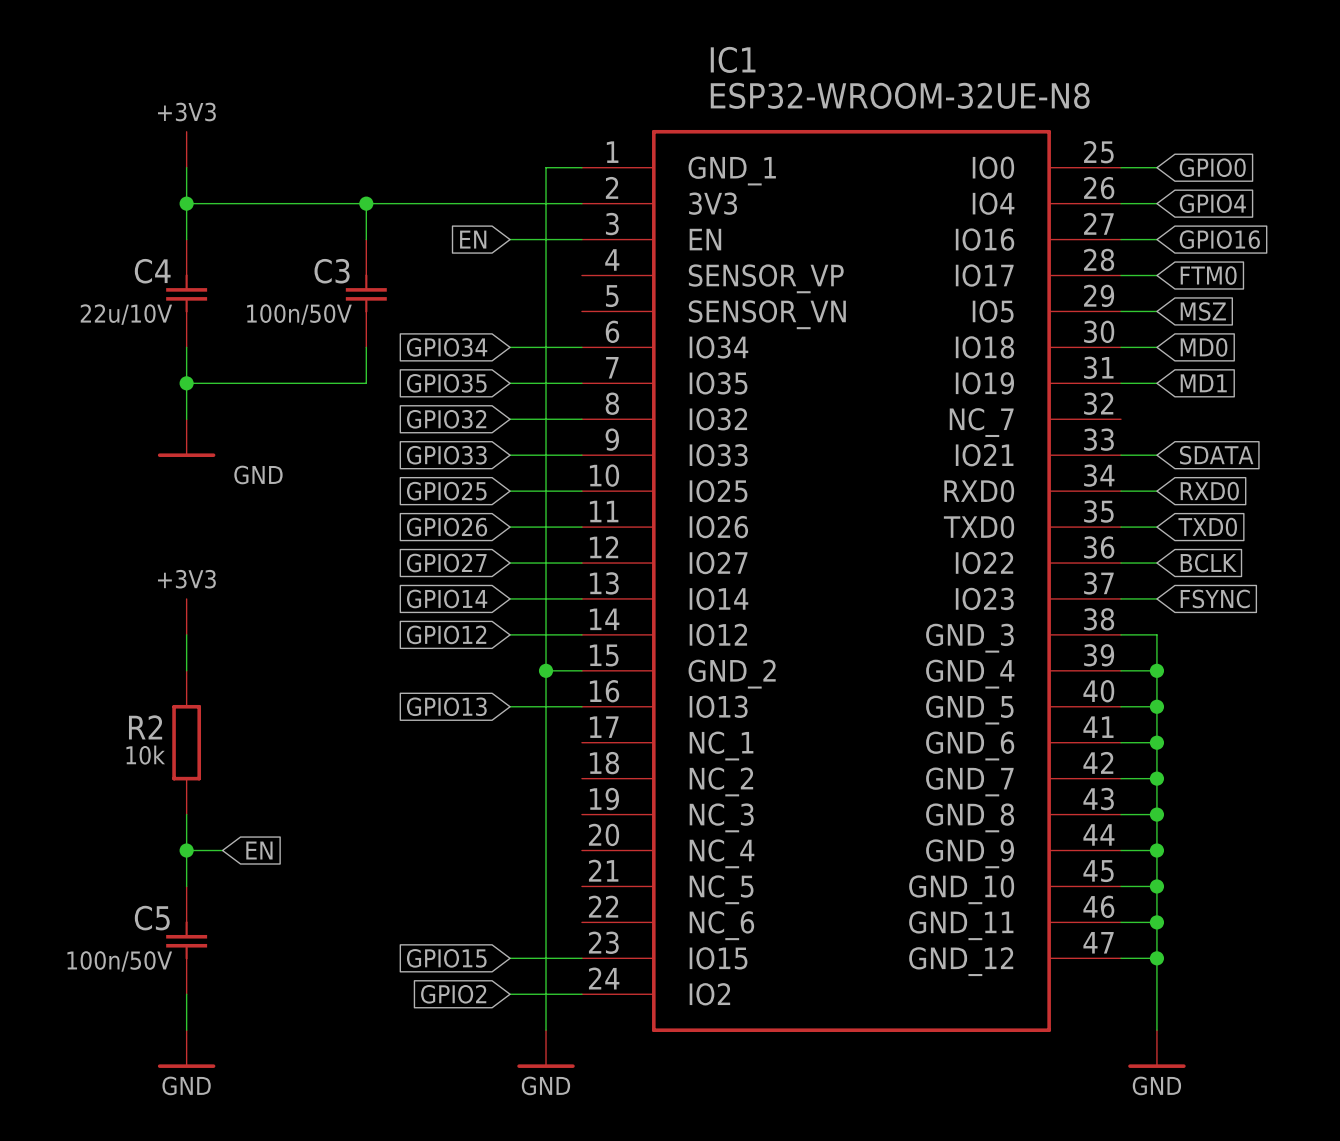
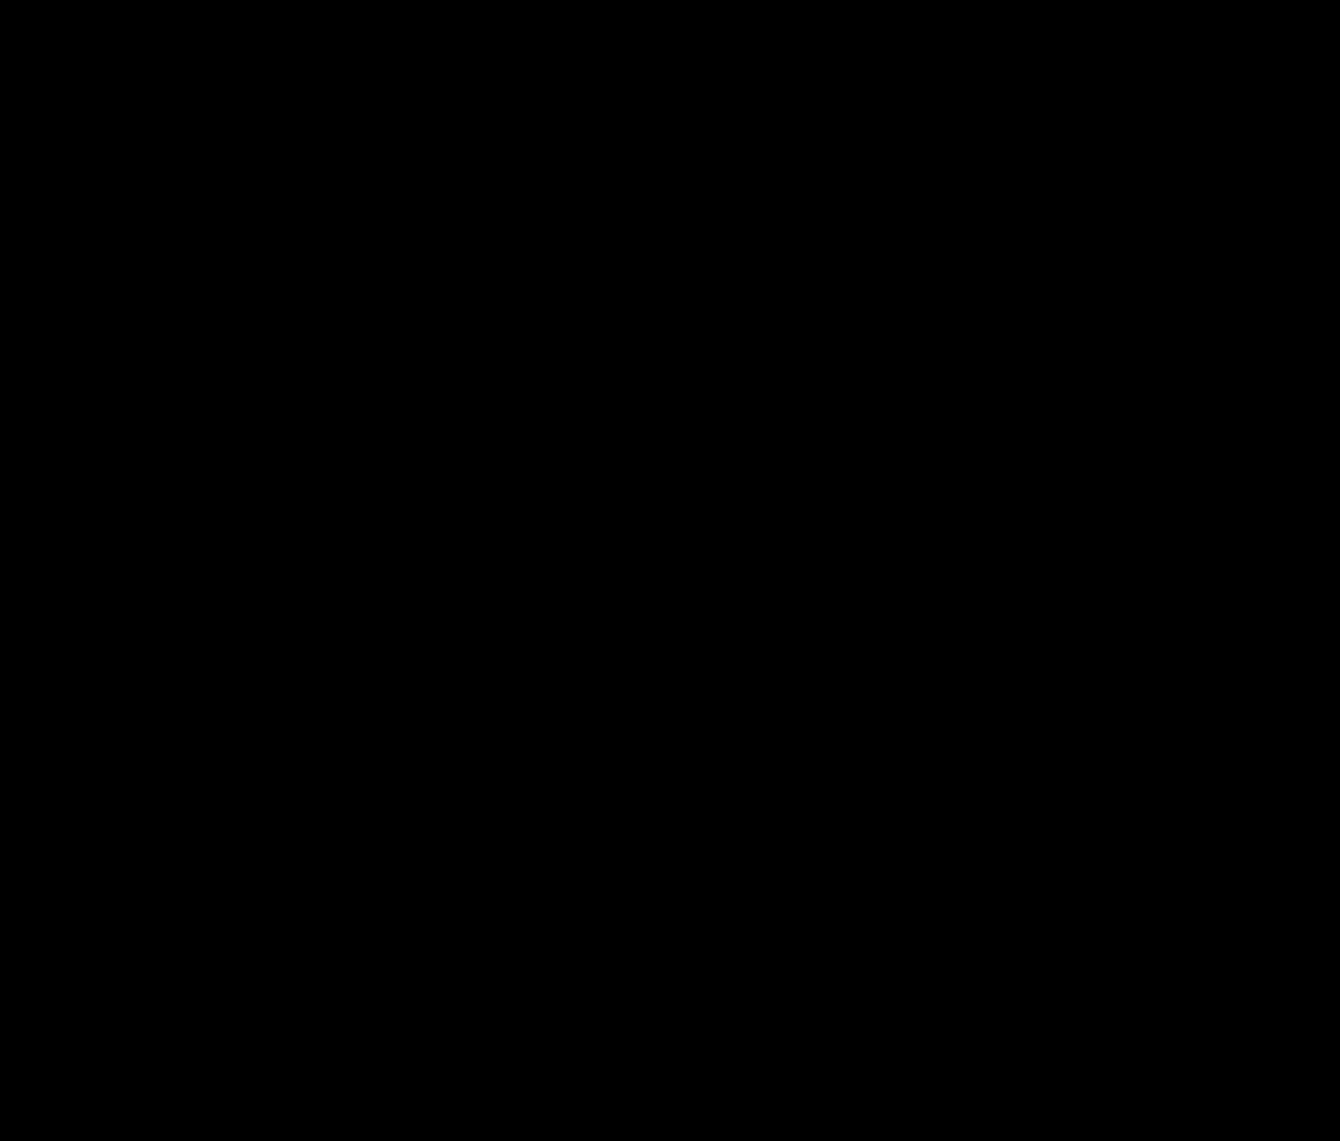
power symbol: +3V3 (186, 149) -> none
wire: (186, 167) (186, 239) -> none
wire: (581, 167) (546, 167) (546, 1030) -> none
wire: (1121, 167) (1156, 167) -> none
global label: GPIO0 (1212, 167) -> none
wire: (186, 203) (581, 203) -> none
junction: (186, 203) -> none
wire: (366, 203) (366, 239) -> none
junction: (366, 203) -> none
wire: (1121, 203) (1156, 203) -> none
global label: GPIO4 (1212, 203) -> none
global label: EN (473, 239) -> none
wire: (510, 239) (581, 239) -> none
wire: (1121, 239) (1156, 239) -> none
global label: GPIO16 (1219, 239) -> none
wire: (1121, 275) (1156, 275) -> none
global label: FTM0 (1208, 275) -> none
C4: 22u/10V (186, 293) -> none
C3: 100n/50V (366, 293) -> none
wire: (1121, 311) (1156, 311) -> none
global label: MSZ (1203, 311) -> none
wire: (186, 347) (186, 419) -> none
wire: (366, 347) (366, 383) (186, 383) -> none
global label: GPIO34 (447, 347) -> none
wire: (510, 347) (581, 347) -> none
wire: (1121, 347) (1156, 347) -> none
global label: MD0 (1204, 347) -> none
junction: (186, 383) -> none
global label: GPIO35 (446, 383) -> none
wire: (510, 383) (581, 383) -> none
wire: (1121, 383) (1156, 383) -> none
global label: MD1 (1203, 383) -> none
global label: GPIO32 (446, 419) -> none
wire: (510, 419) (581, 419) -> none
power symbol: GND (186, 438) -> none
global label: GPIO33 (446, 455) -> none
wire: (510, 455) (581, 455) -> none
wire: (1121, 455) (1156, 455) -> none
global label: SDATA (1216, 455) -> none
global label: GPIO25 (446, 491) -> none
wire: (510, 491) (581, 491) -> none
wire: (1121, 491) (1156, 491) -> none
global label: RXD0 (1209, 491) -> none
global label: GPIO26 (447, 527) -> none
wire: (510, 527) (581, 527) -> none
wire: (1121, 527) (1156, 527) -> none
global label: TXD0 (1207, 527) -> none
global label: GPIO27 (446, 563) -> none
wire: (510, 563) (581, 563) -> none
wire: (1121, 563) (1156, 563) -> none
global label: BCLK (1208, 563) -> none
IC1: ESP32-WROOM-32UE-N8 (851, 580) -> none
global label: GPIO14 (447, 598) -> none
wire: (510, 598) (581, 598) -> none
wire: (1121, 598) (1156, 598) -> none
global label: FSYNC (1215, 598) -> none
power symbol: +3V3 (186, 616) -> none
wire: (186, 634) (186, 670) -> none
global label: GPIO12 (446, 634) -> none
wire: (510, 634) (581, 634) -> none
wire: (1121, 634) (1156, 634) (1156, 1030) -> none
wire: (546, 670) (581, 670) -> none
junction: (546, 670) -> none
wire: (1121, 670) (1156, 670) -> none
junction: (1156, 670) -> none
global label: GPIO13 (446, 706) -> none
wire: (510, 706) (581, 706) -> none
wire: (1121, 706) (1156, 706) -> none
junction: (1156, 706) -> none
R2: 10k (186, 742) -> none
wire: (1121, 742) (1156, 742) -> none
junction: (1156, 742) -> none
wire: (1121, 778) (1156, 778) -> none
junction: (1156, 778) -> none
wire: (186, 814) (186, 886) -> none
wire: (1121, 814) (1156, 814) -> none
junction: (1156, 814) -> none
wire: (186, 850) (222, 850) -> none
junction: (186, 850) -> none
global label: EN (259, 850) -> none
wire: (1121, 850) (1156, 850) -> none
junction: (1156, 850) -> none
wire: (1121, 886) (1156, 886) -> none
junction: (1156, 886) -> none
wire: (1121, 922) (1156, 922) -> none
junction: (1156, 922) -> none
C5: 100n/50V (186, 940) -> none
global label: GPIO15 (446, 958) -> none
wire: (510, 958) (581, 958) -> none
wire: (1121, 958) (1156, 958) -> none
junction: (1156, 958) -> none
wire: (186, 994) (186, 1030) -> none
global label: GPIO2 (453, 994) -> none
wire: (510, 994) (581, 994) -> none
power symbol: GND (186, 1049) -> none
power symbol: GND (546, 1049) -> none
power symbol: GND (1156, 1049) -> none

